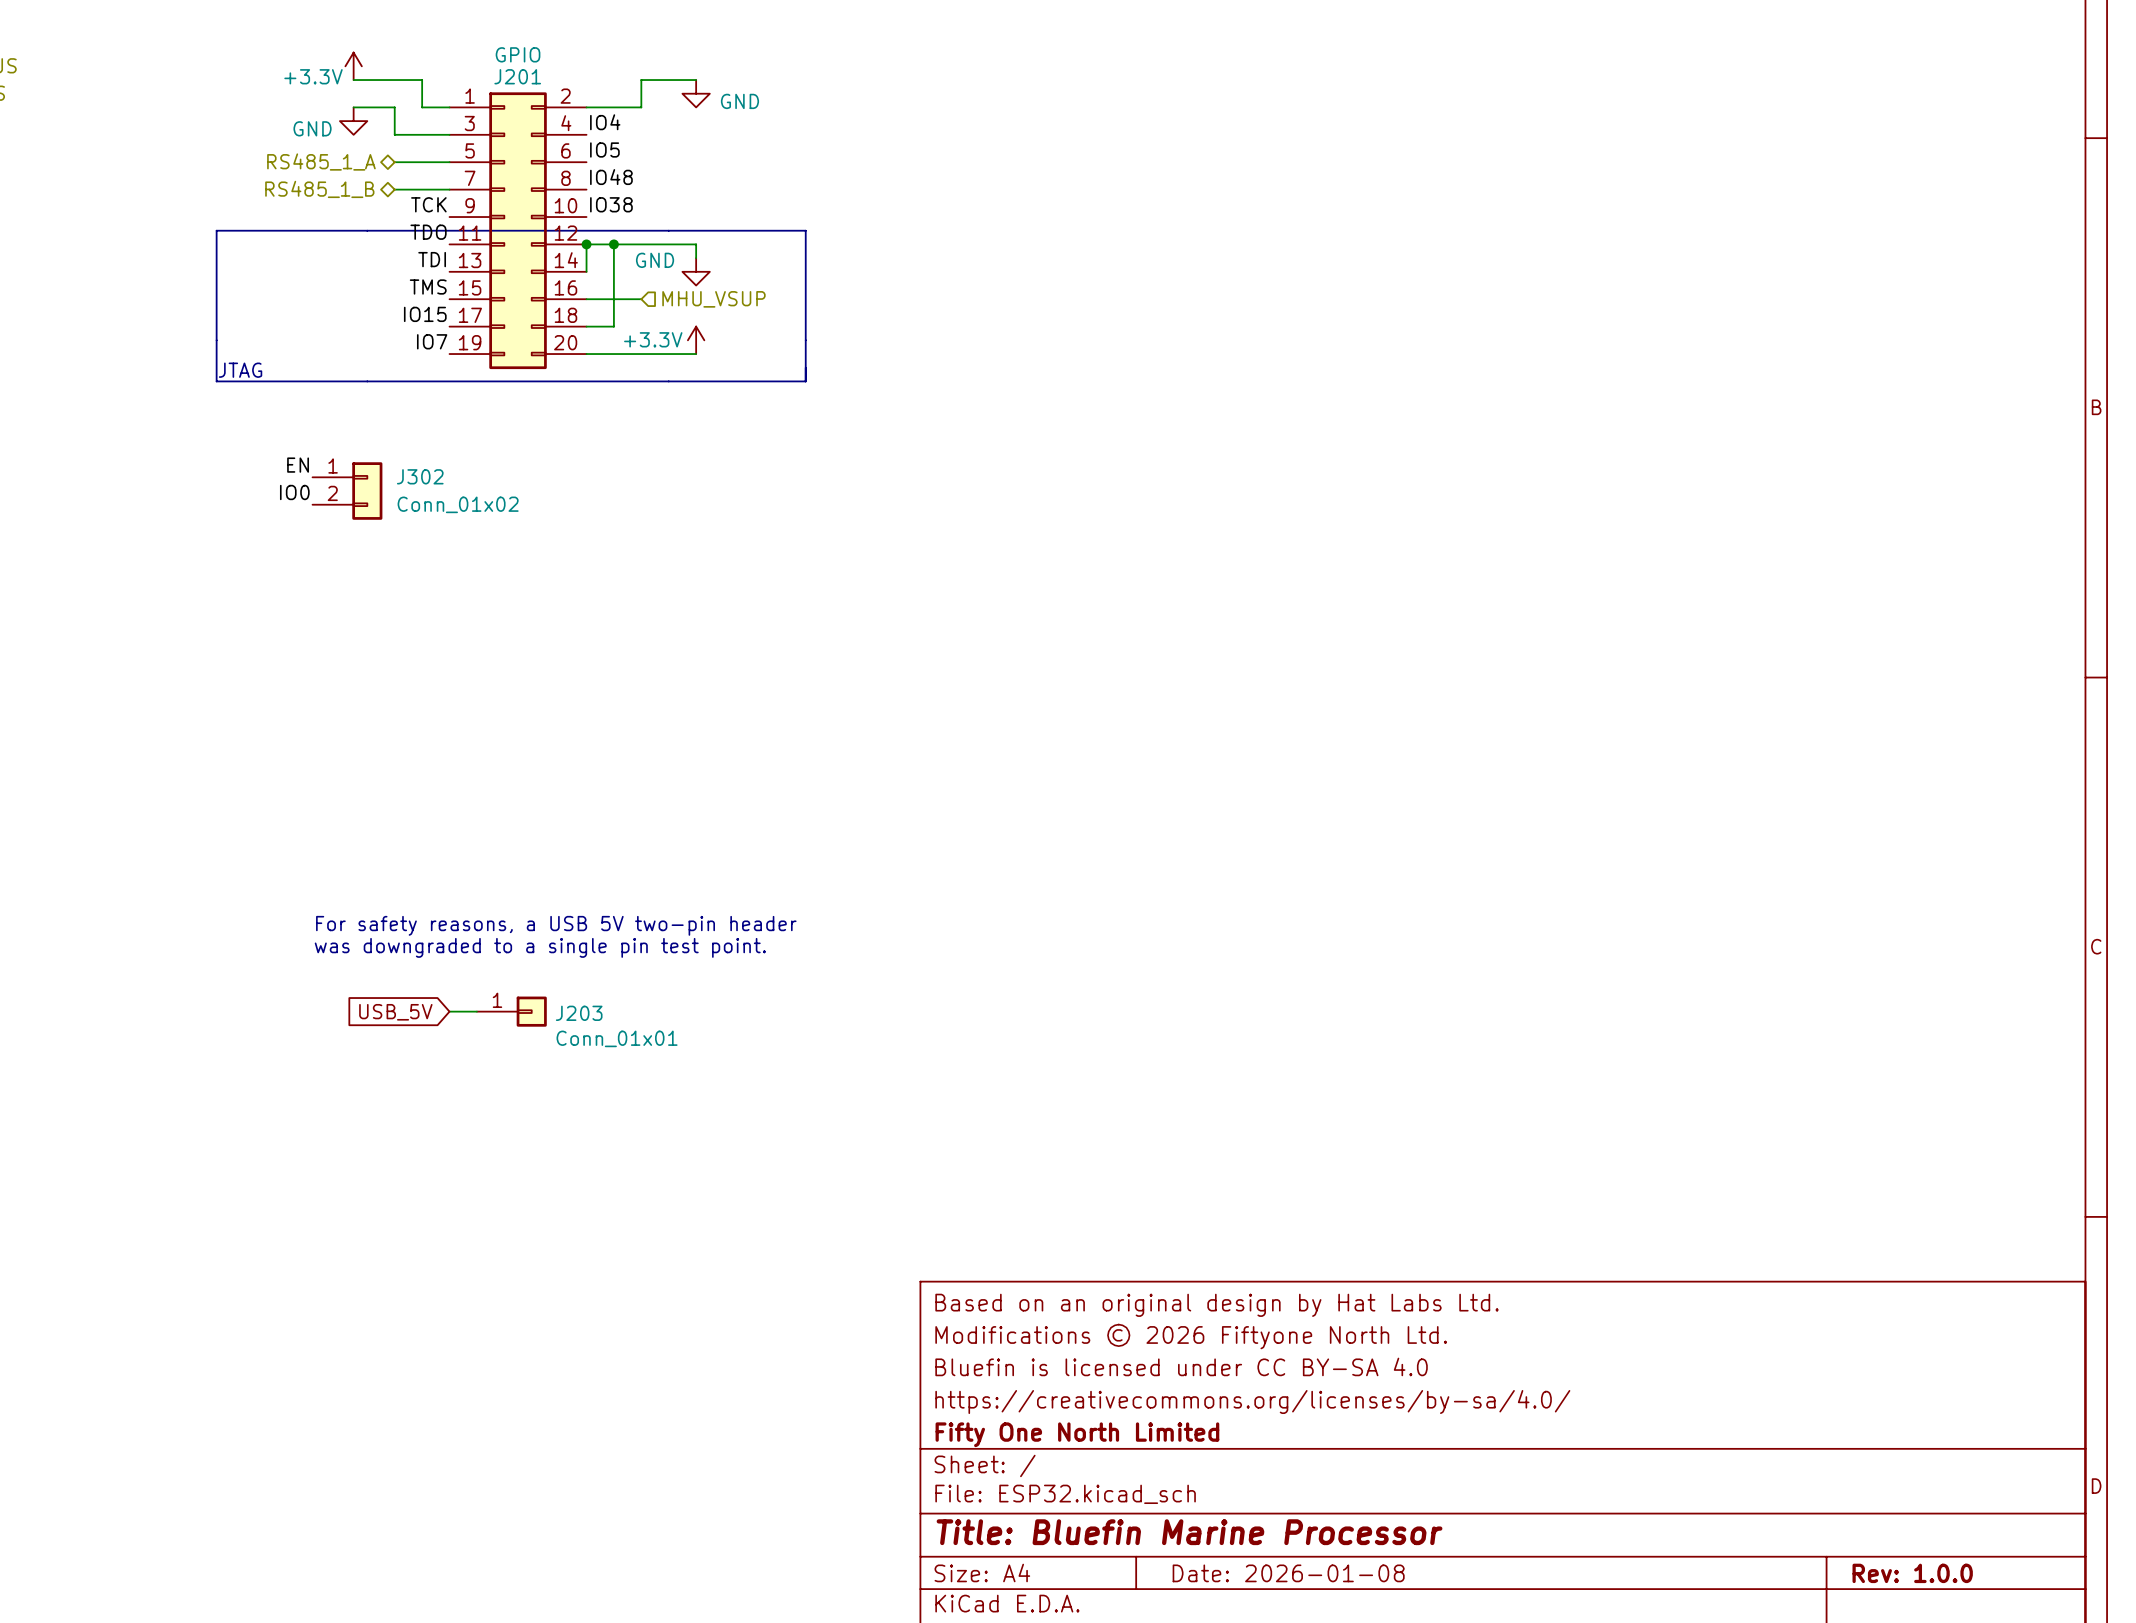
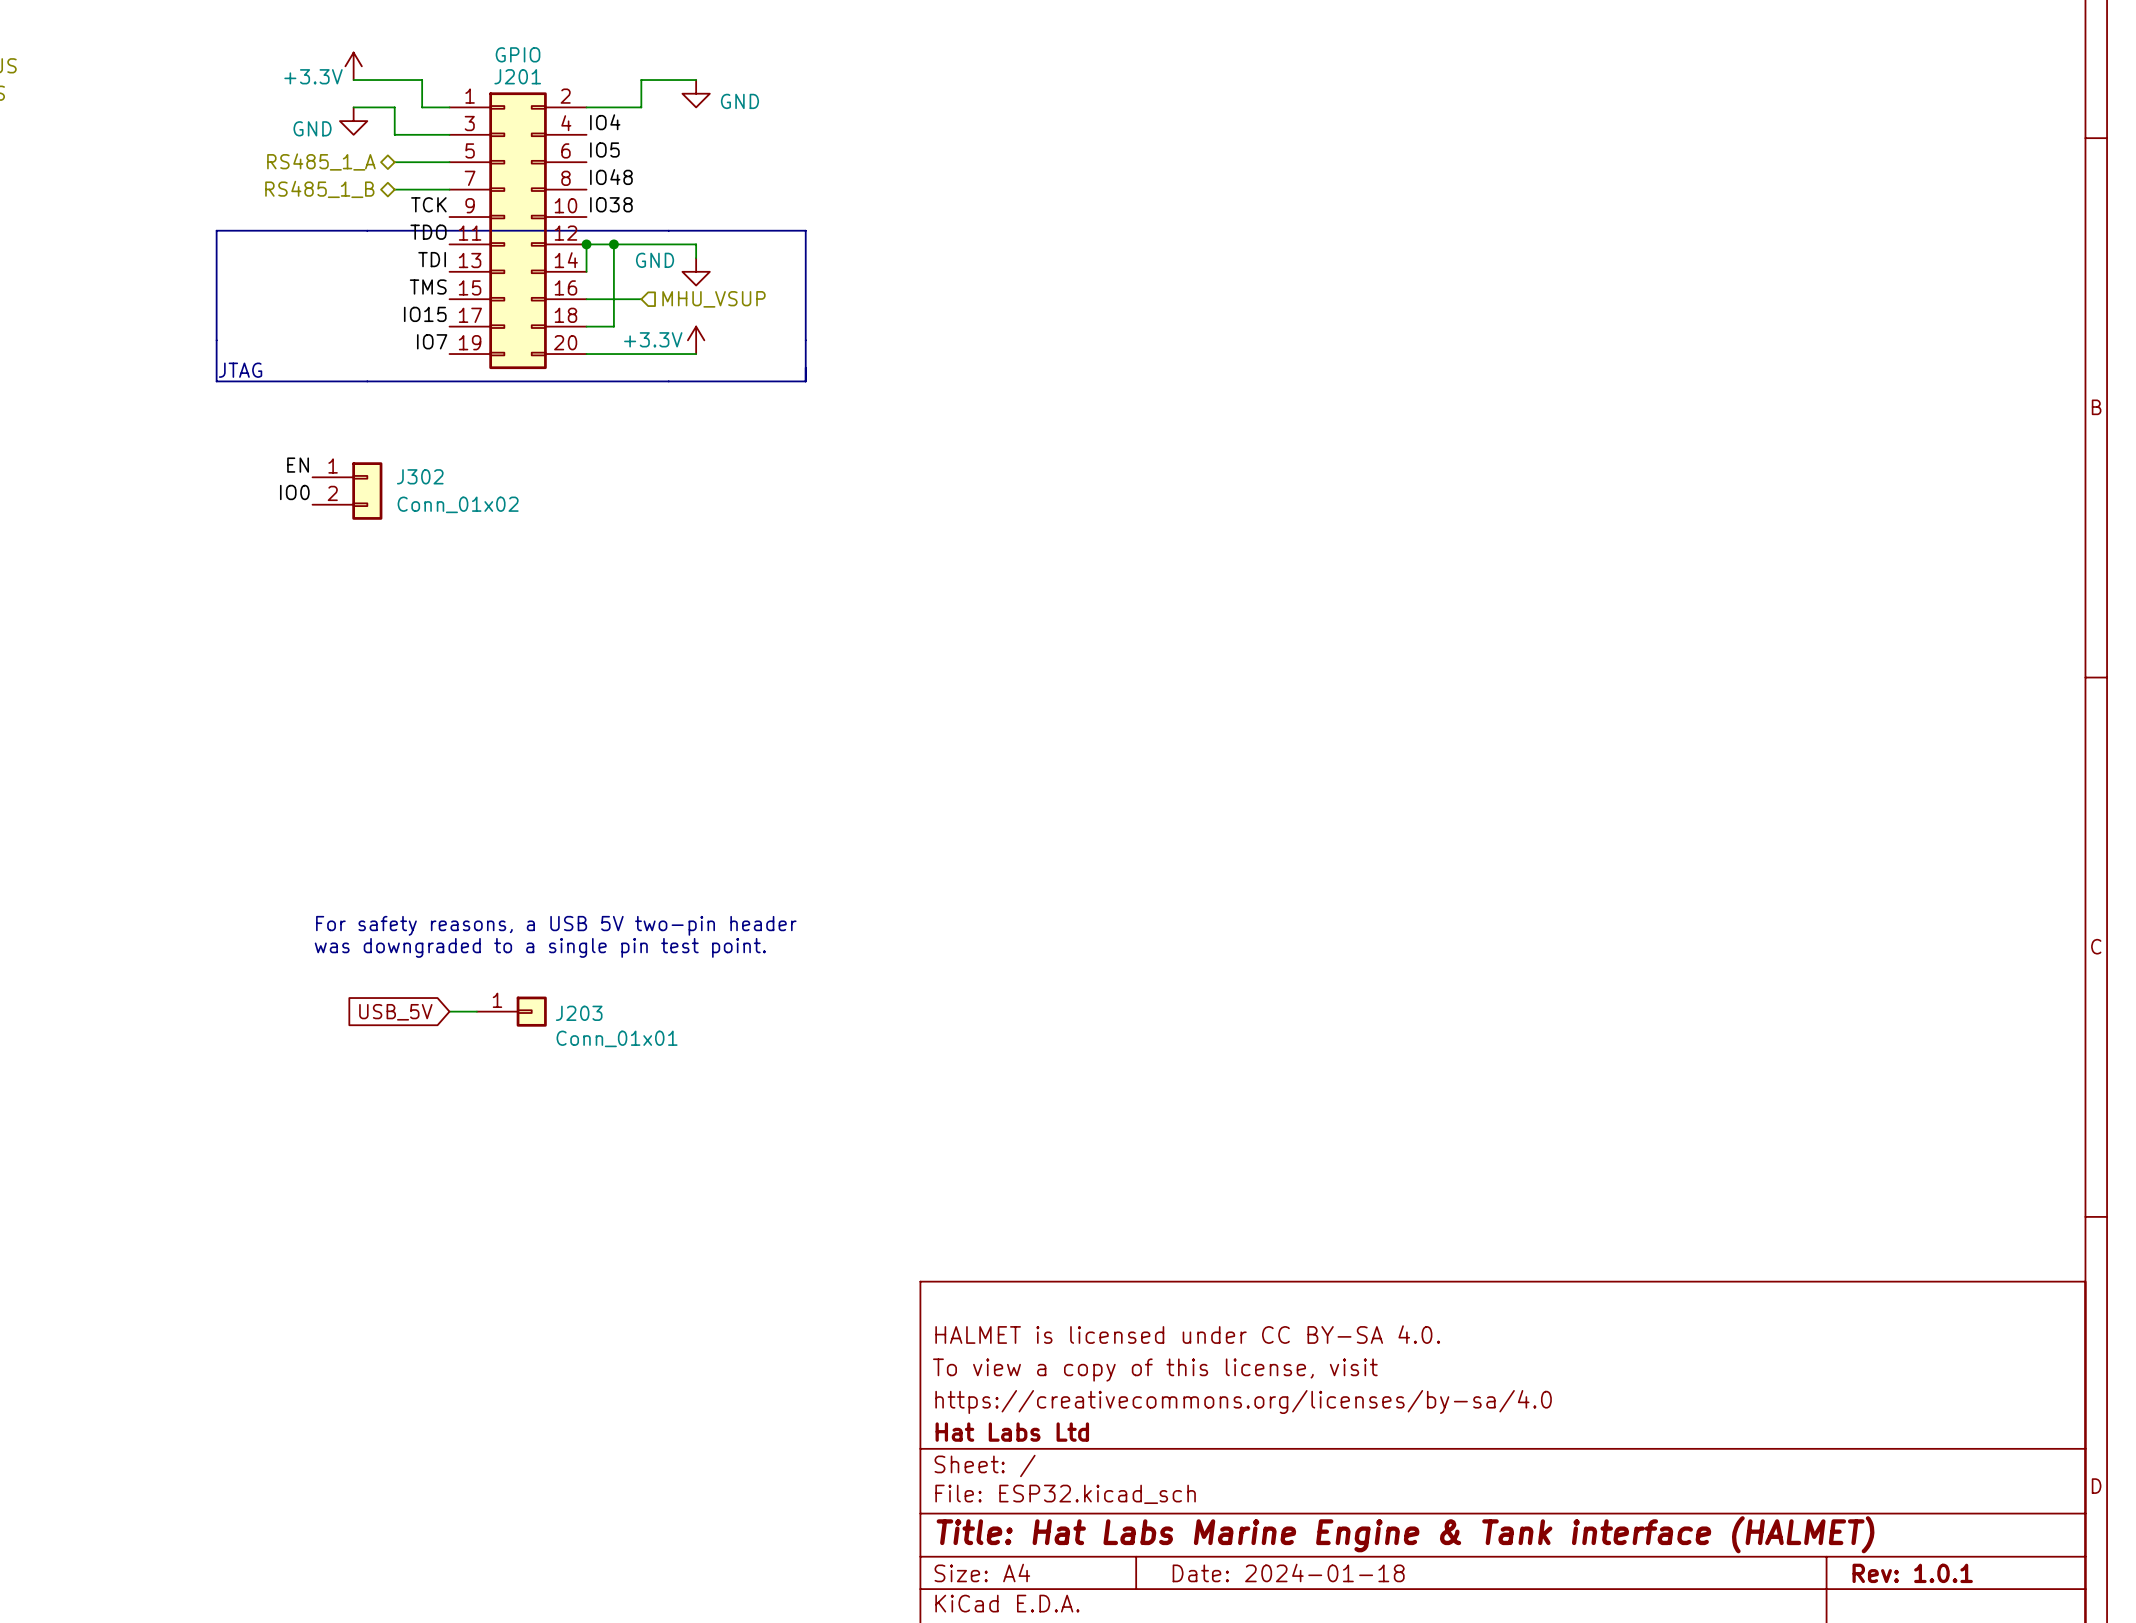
title block: Based on an original design by Hat Labs Ltd. (1216, 1305) -> none
title block: Modifications © 2026 Fiftyone North Ltd. (1191, 1336) -> HALMET is licensed under CC BY-SA 4.0. (1187, 1334)
title block: Bluefin is licensed under CC BY-SA 4.0 (1181, 1366) -> To view a copy of this license, visit (1155, 1370)
title block: https://creativecommons.org/licenses/by-sa/4.0/ (1252, 1402) -> https://creativecommons.org/licenses/by-sa/4.0 (1243, 1402)
title block: Fifty One North Limited (1077, 1434) -> Hat Labs Ltd (1012, 1432)
title block: Title: Bluefin Marine Processor (1189, 1532) -> Title: Hat Labs Marine Engine & Tank interface (HALMET) (1405, 1534)
title block: Date: 2026-01-08 (1288, 1573) -> Date: 2024-01-18 (1288, 1572)
title block: Rev: 1.0.0 (1912, 1573) -> Rev: 1.0.1 (1912, 1573)

